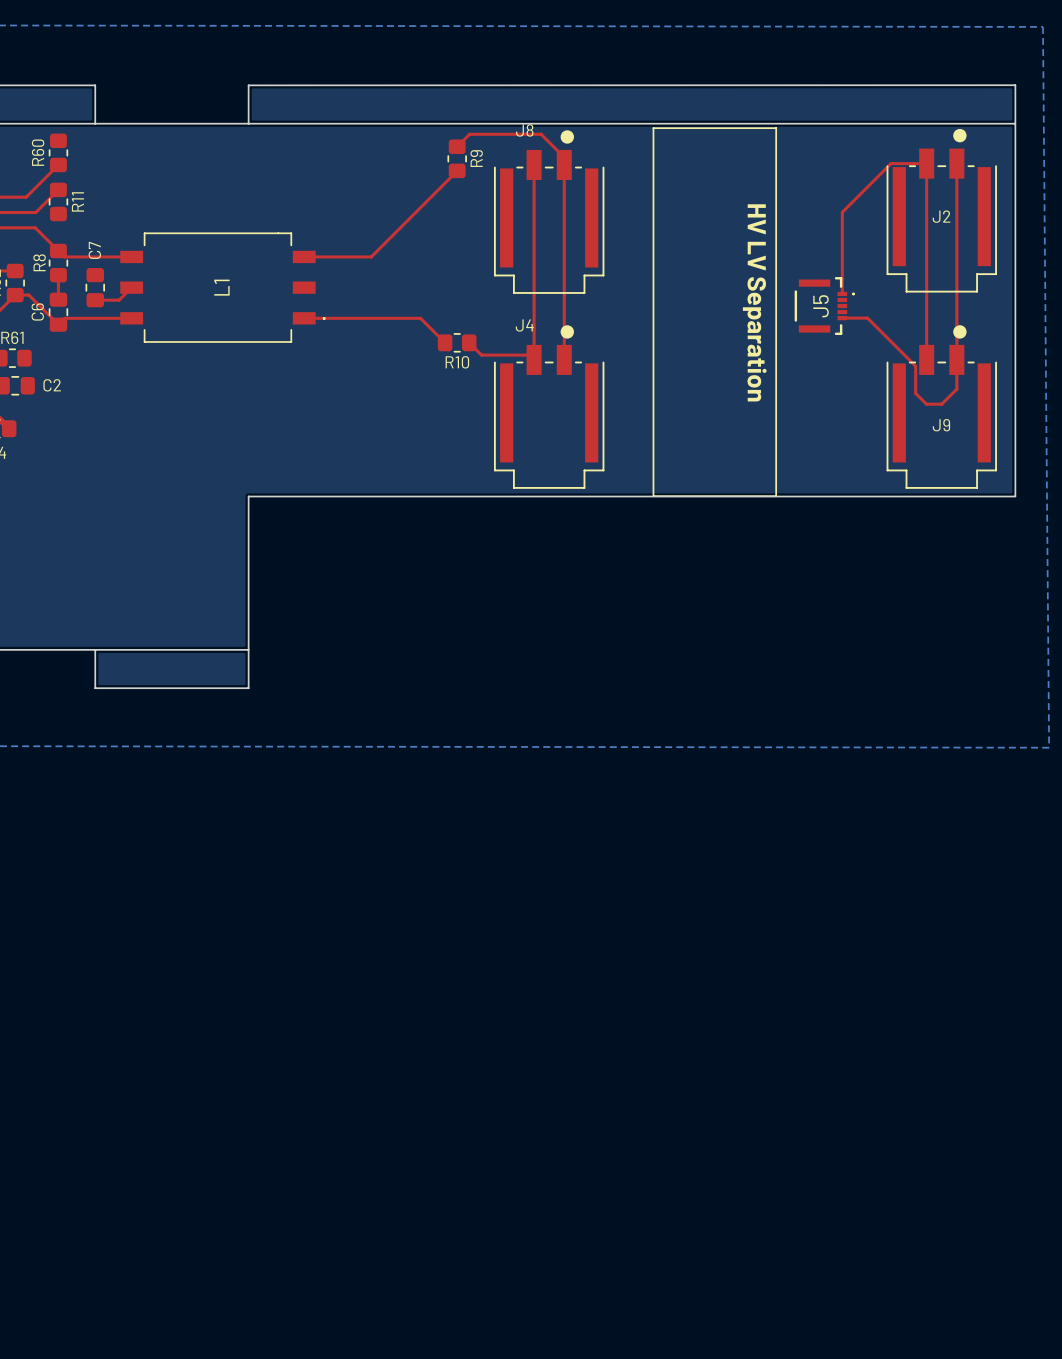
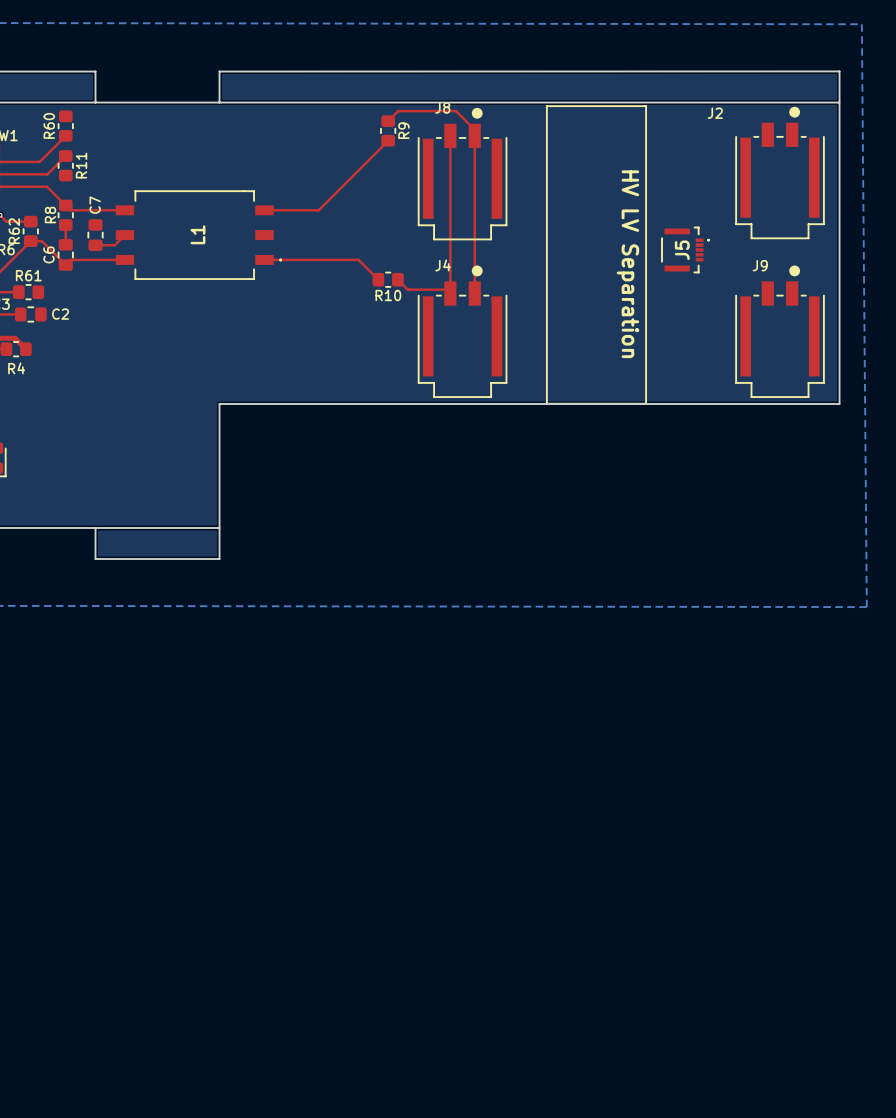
top track: (956, 163) (956, 389) (941, 404) (926, 404) (915, 393) (915, 366) (867, 318) (842, 318) -> none
J2 name position: J2 (941, 216) -> J2 (715, 113)
top track: (842, 293) (842, 212) (890, 163) (926, 163) (926, 359) -> none
J9 name position: J9 (941, 425) -> J9 (760, 265)

